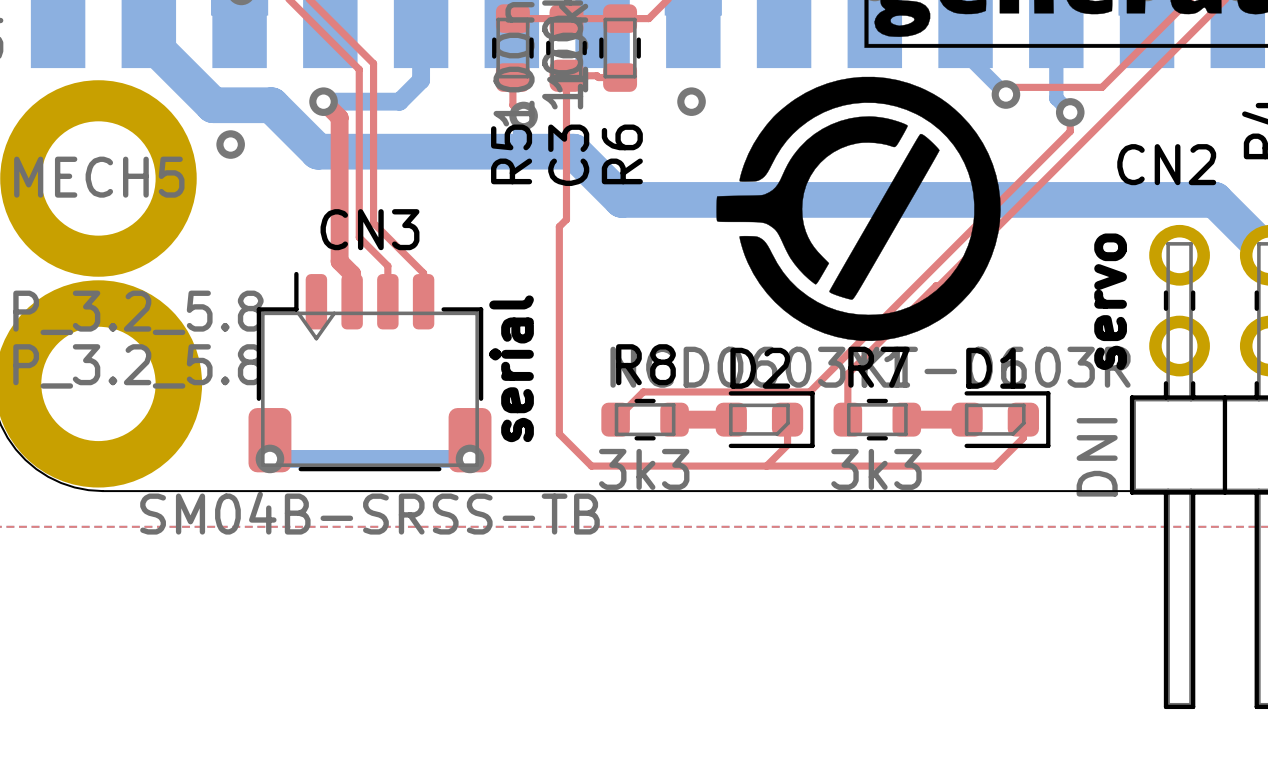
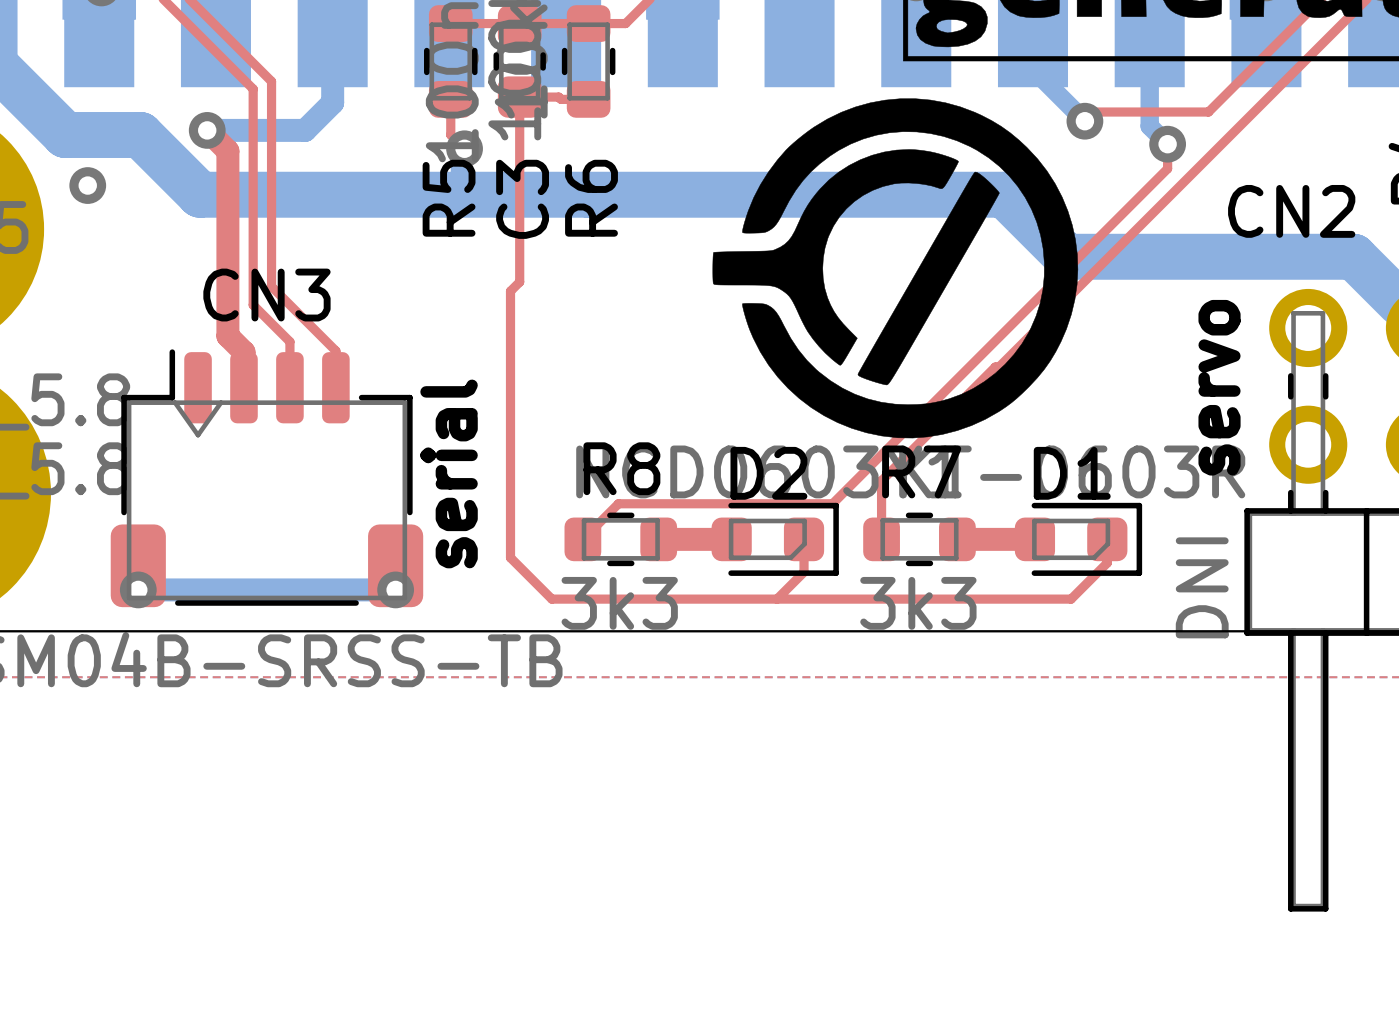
via: (691, 101) -> none
bottom track: (573, 151) (621, 199) (991, 199) -> (528, 194) (1004, 194) (1066, 256)

